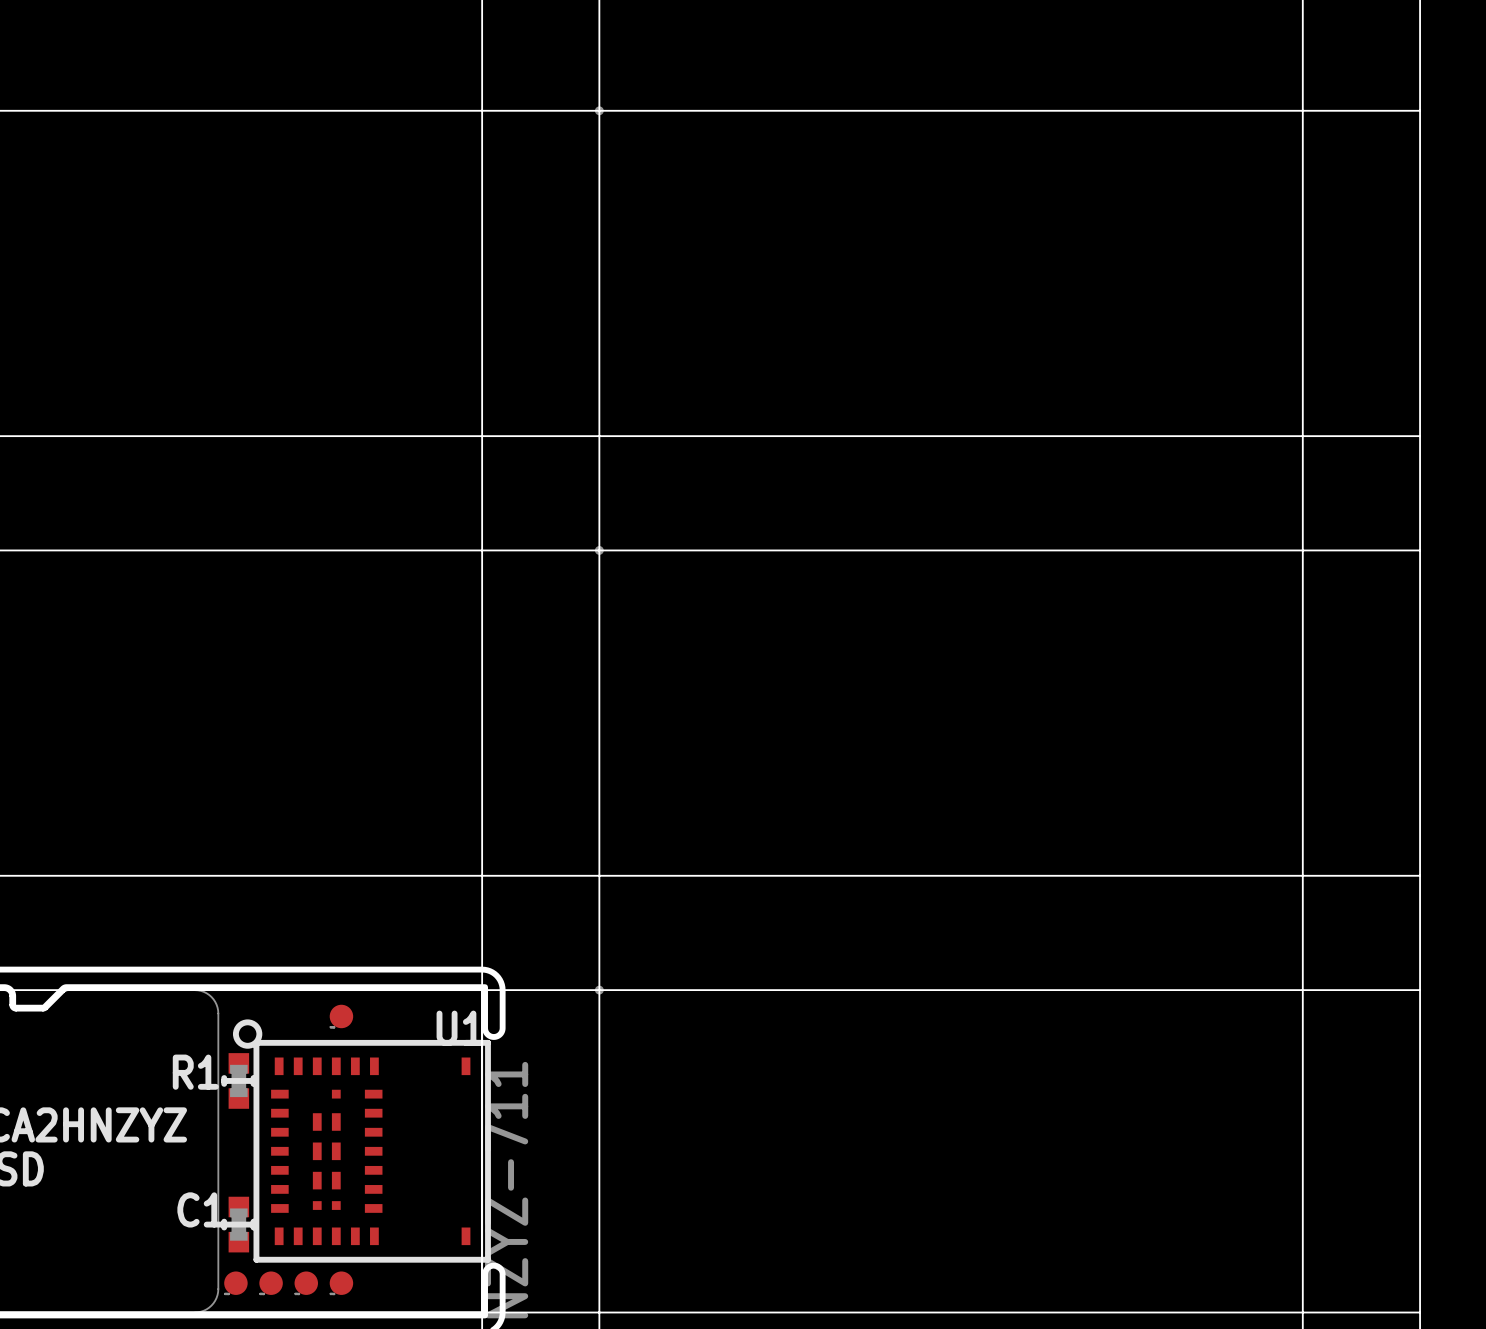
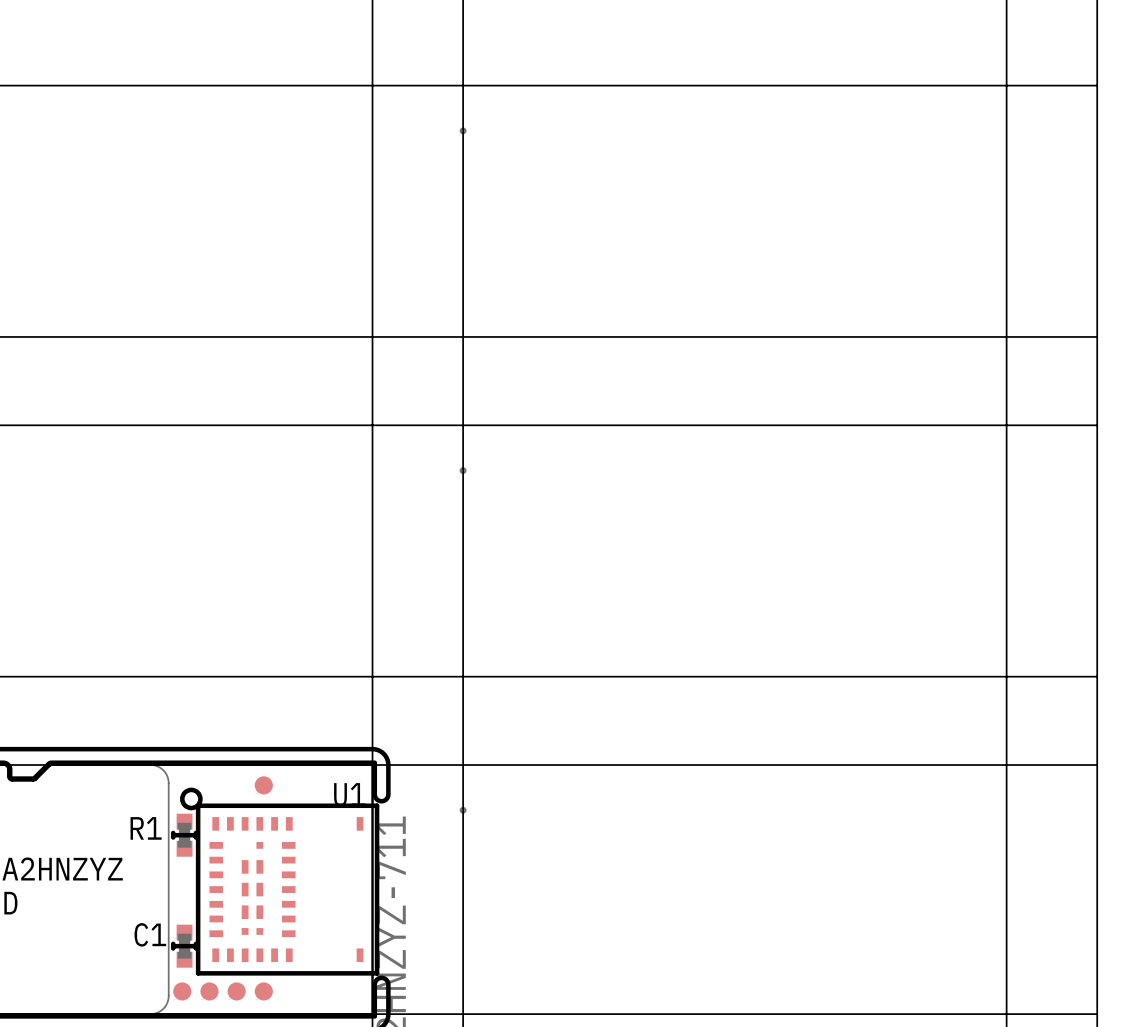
drawing position: (599, 110) -> (463, 130)
drawing position: (599, 550) -> (463, 470)
drawing position: (599, 990) -> (463, 810)

